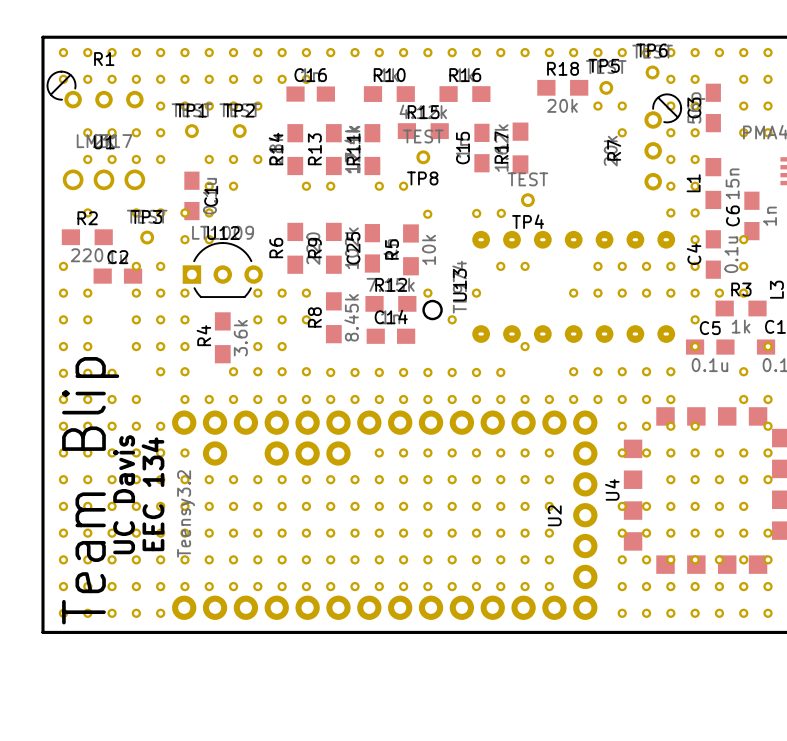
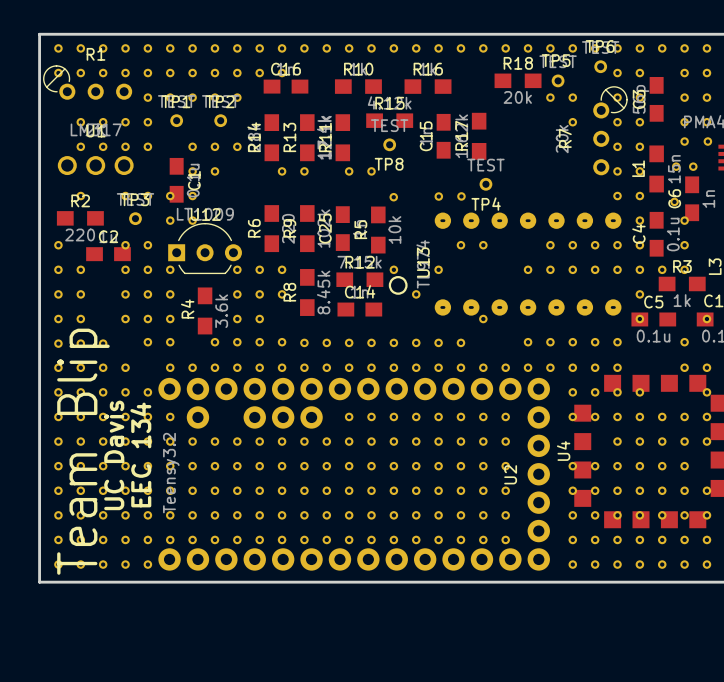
part: none -> (684, 141)
part: none -> (707, 141)
part: none -> (676, 166)
part: none -> (693, 166)
part: none -> (674, 201)

